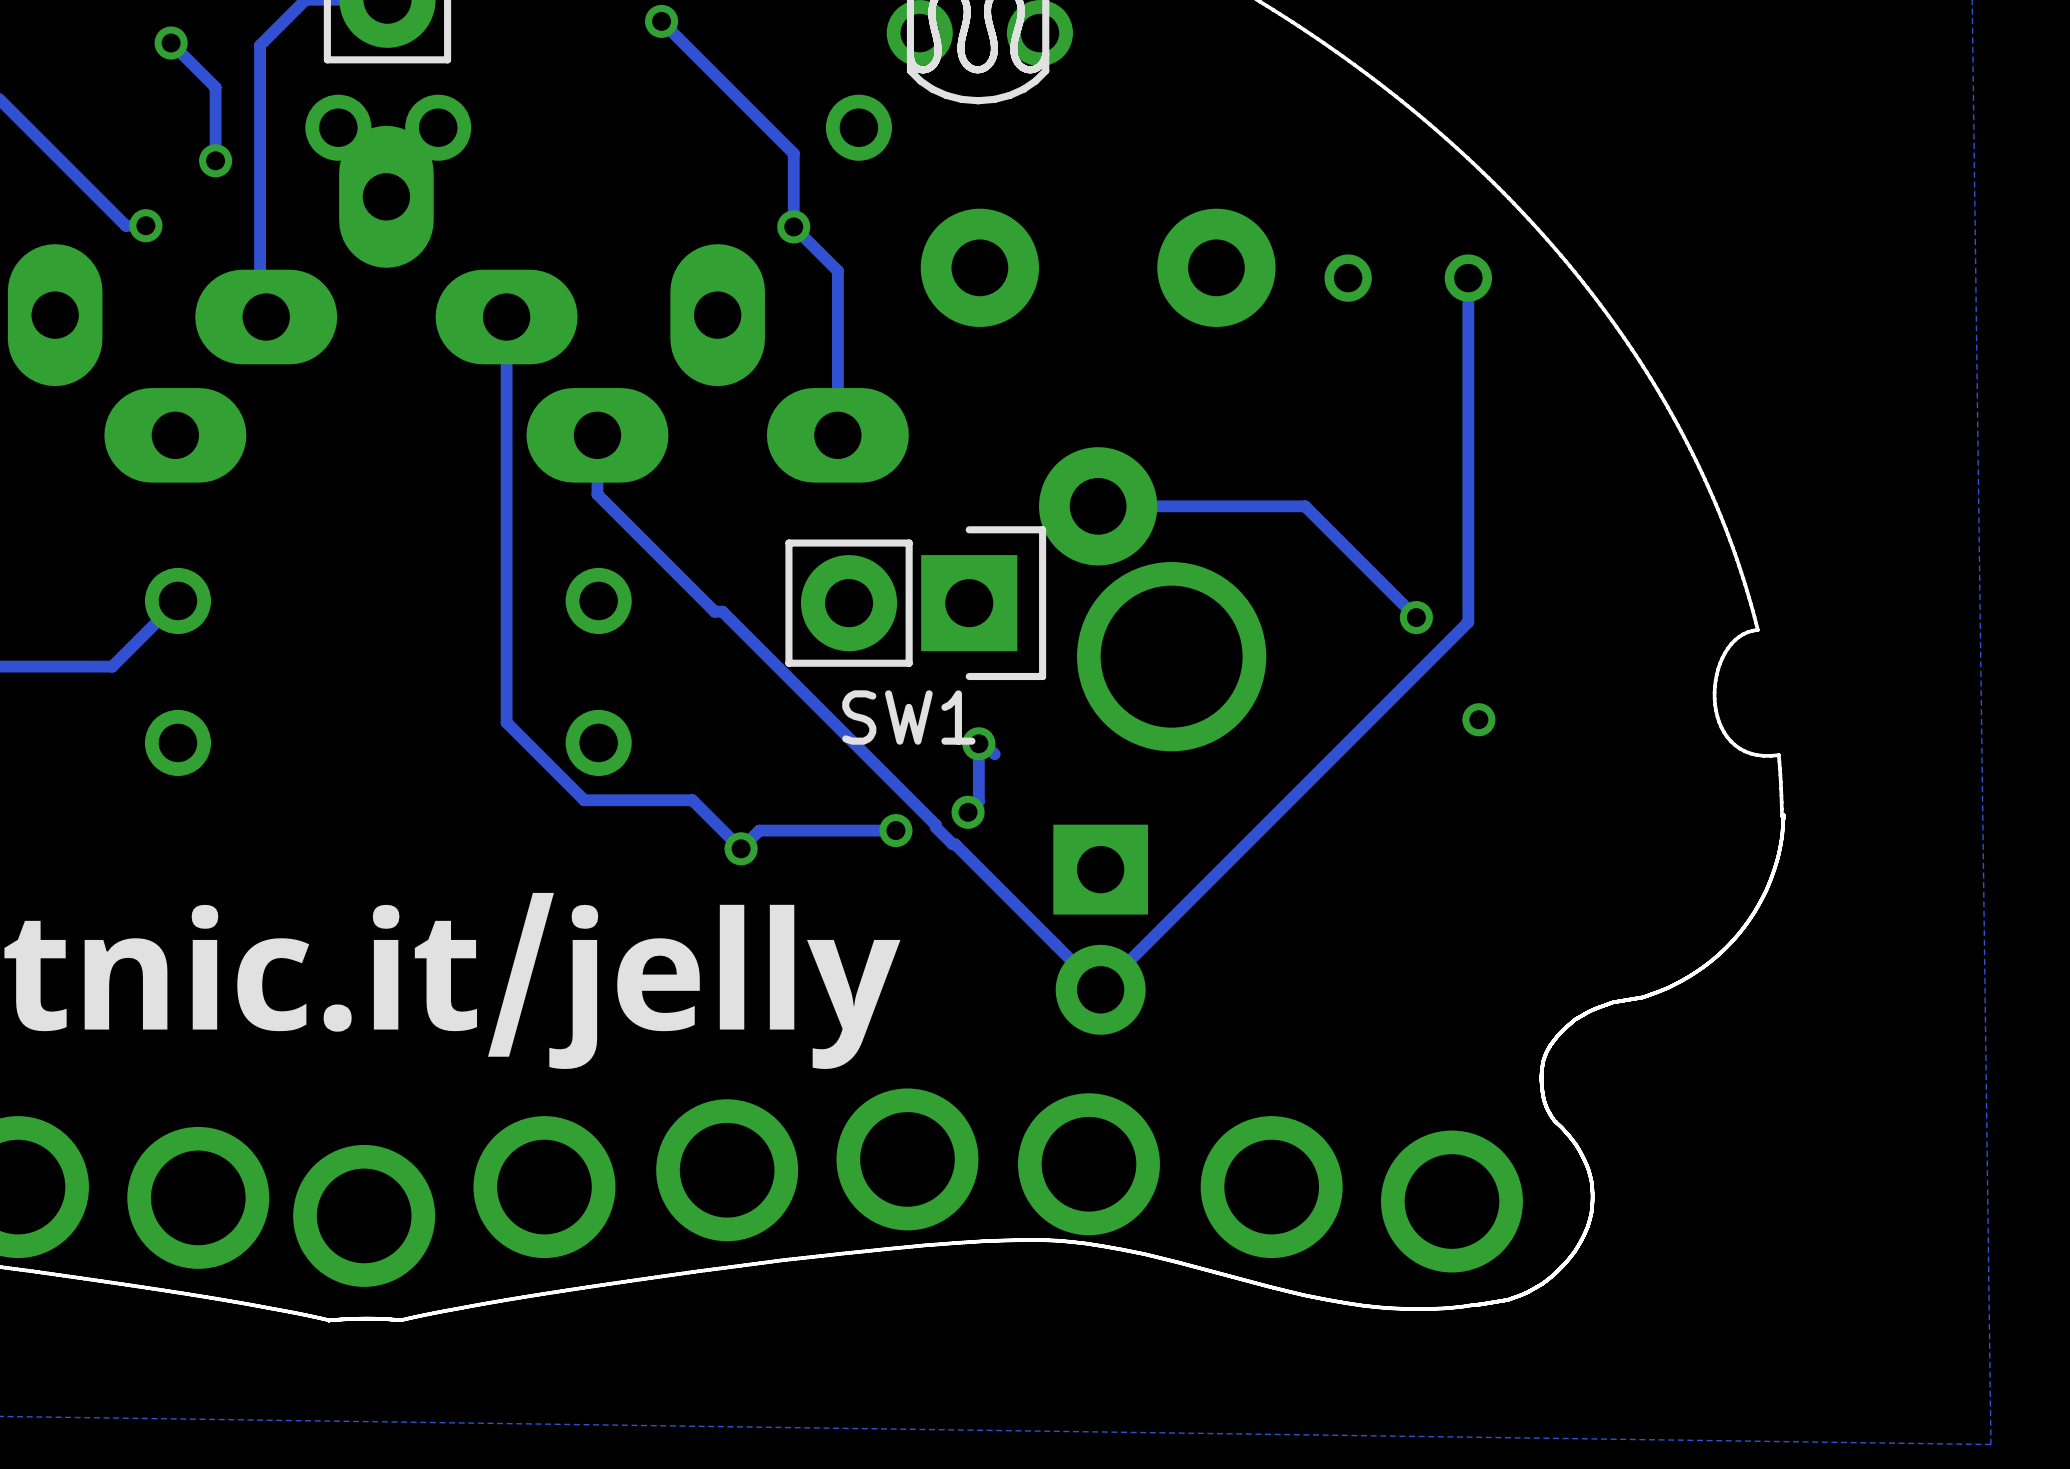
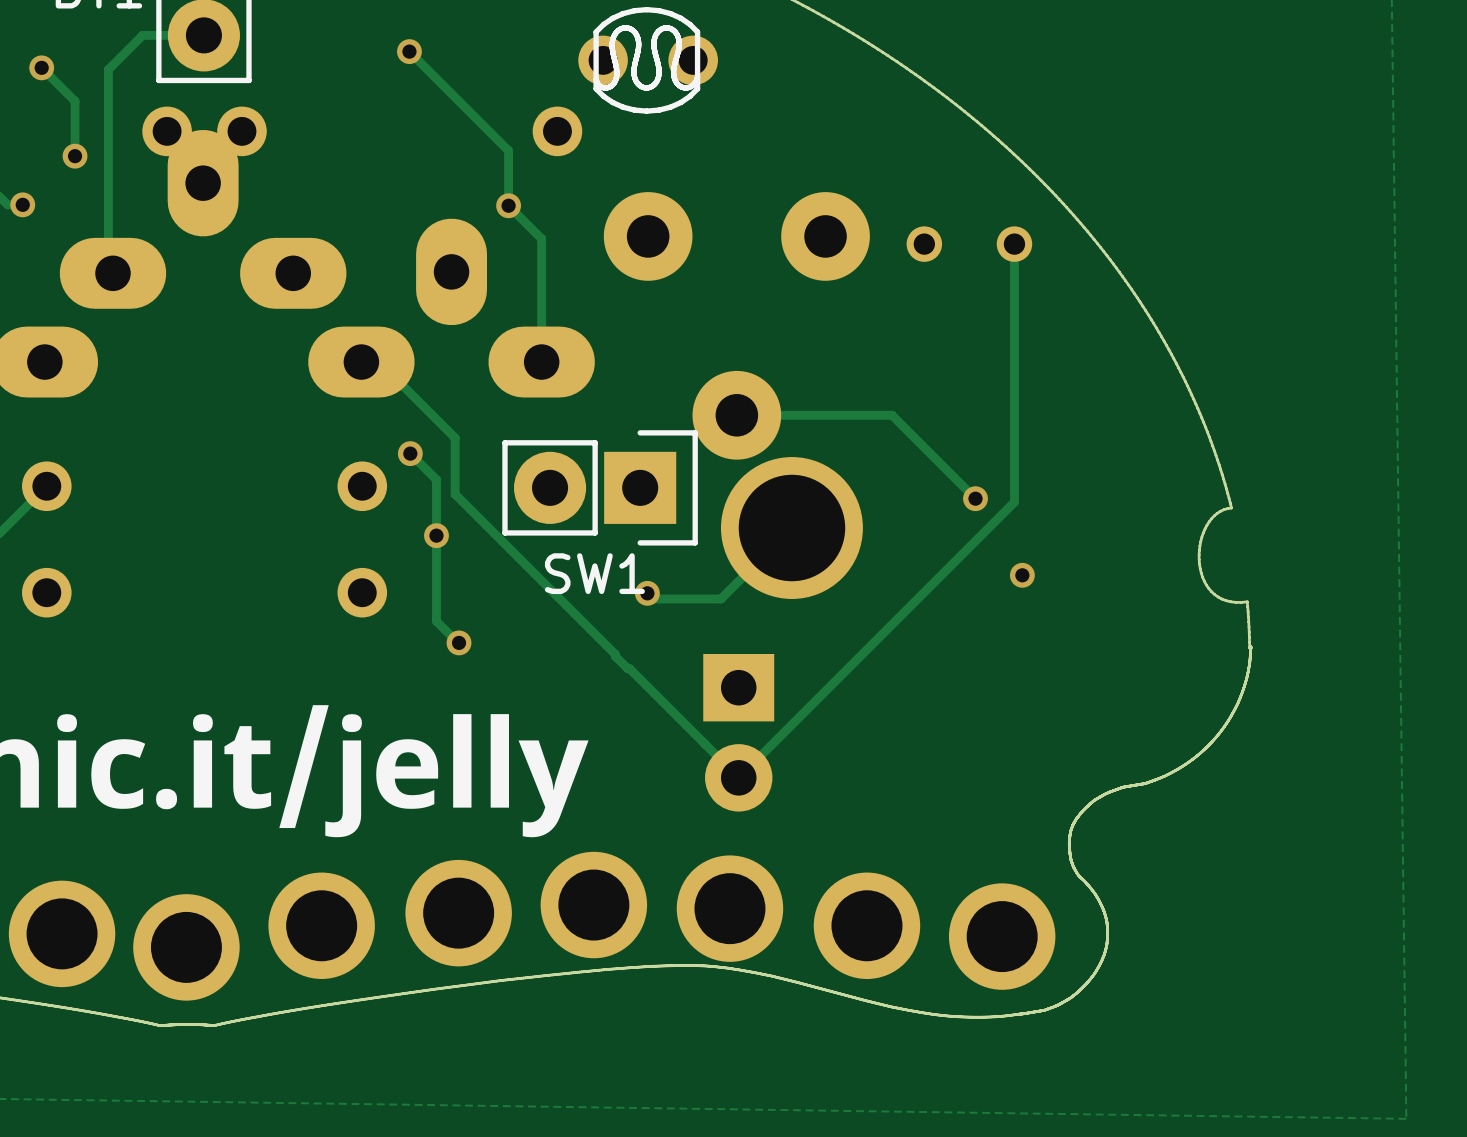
track: (506, 317) (506, 722) (584, 800) (692, 800) (741, 848) (759, 830) (895, 830) -> none
track: (597, 435) (597, 494) (714, 611) (722, 611) -> (361, 362) (379, 362) (455, 438) (455, 494)
track: none -> (410, 453) (436, 479) (436, 621) (459, 642)
via: none -> (410, 453)
track: none -> (791, 528) (720, 598) (653, 598) (647, 593)
via: none -> (436, 535)
track: (994, 754) (984, 743) (978, 743) (978, 801) (968, 812) -> none
via: (968, 812) -> none
via: (895, 830) -> none
via position: (741, 848) -> (459, 642)

